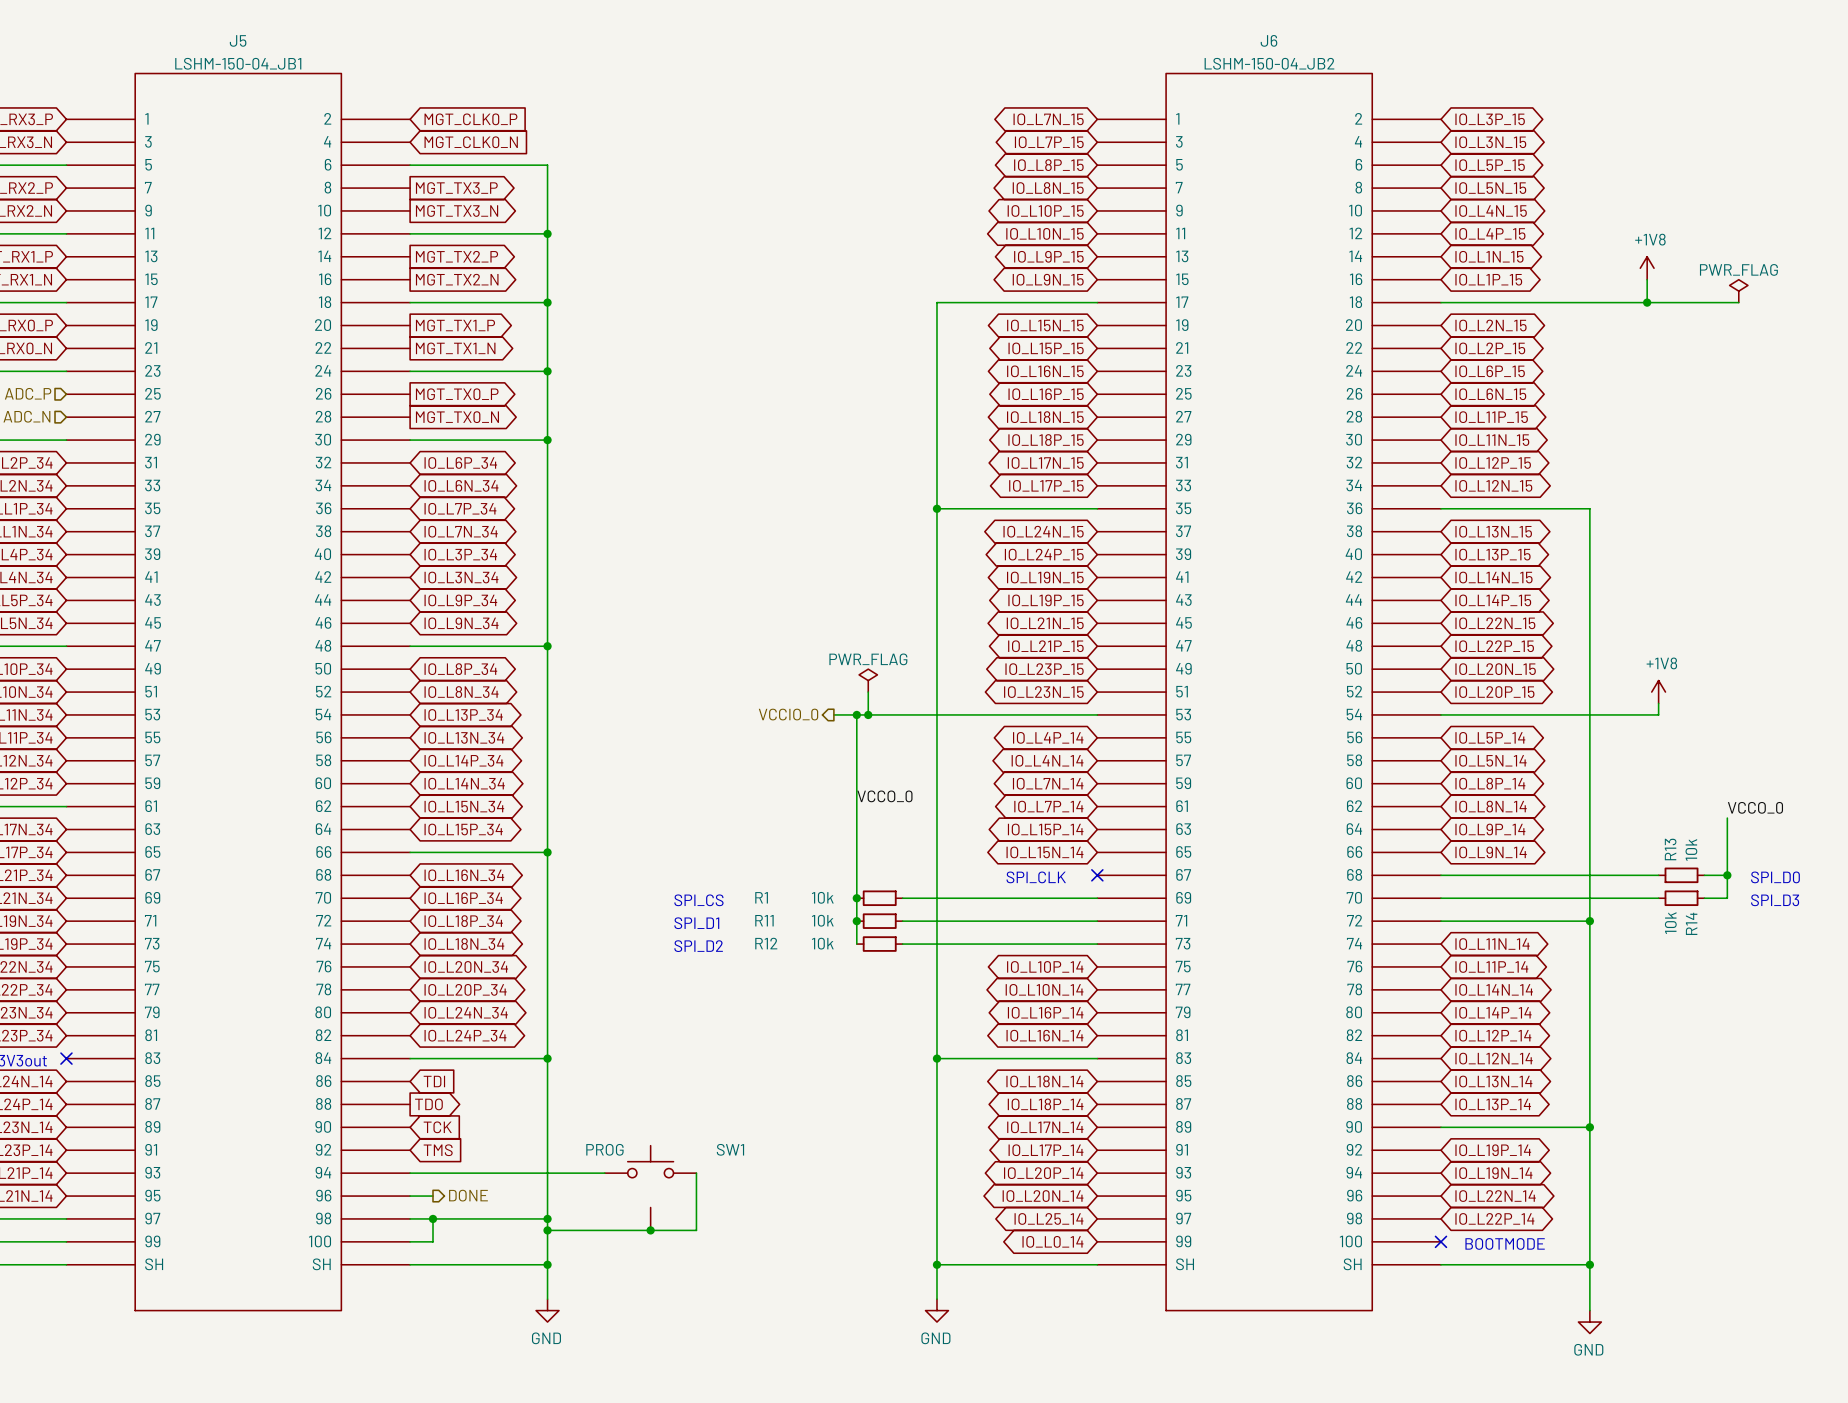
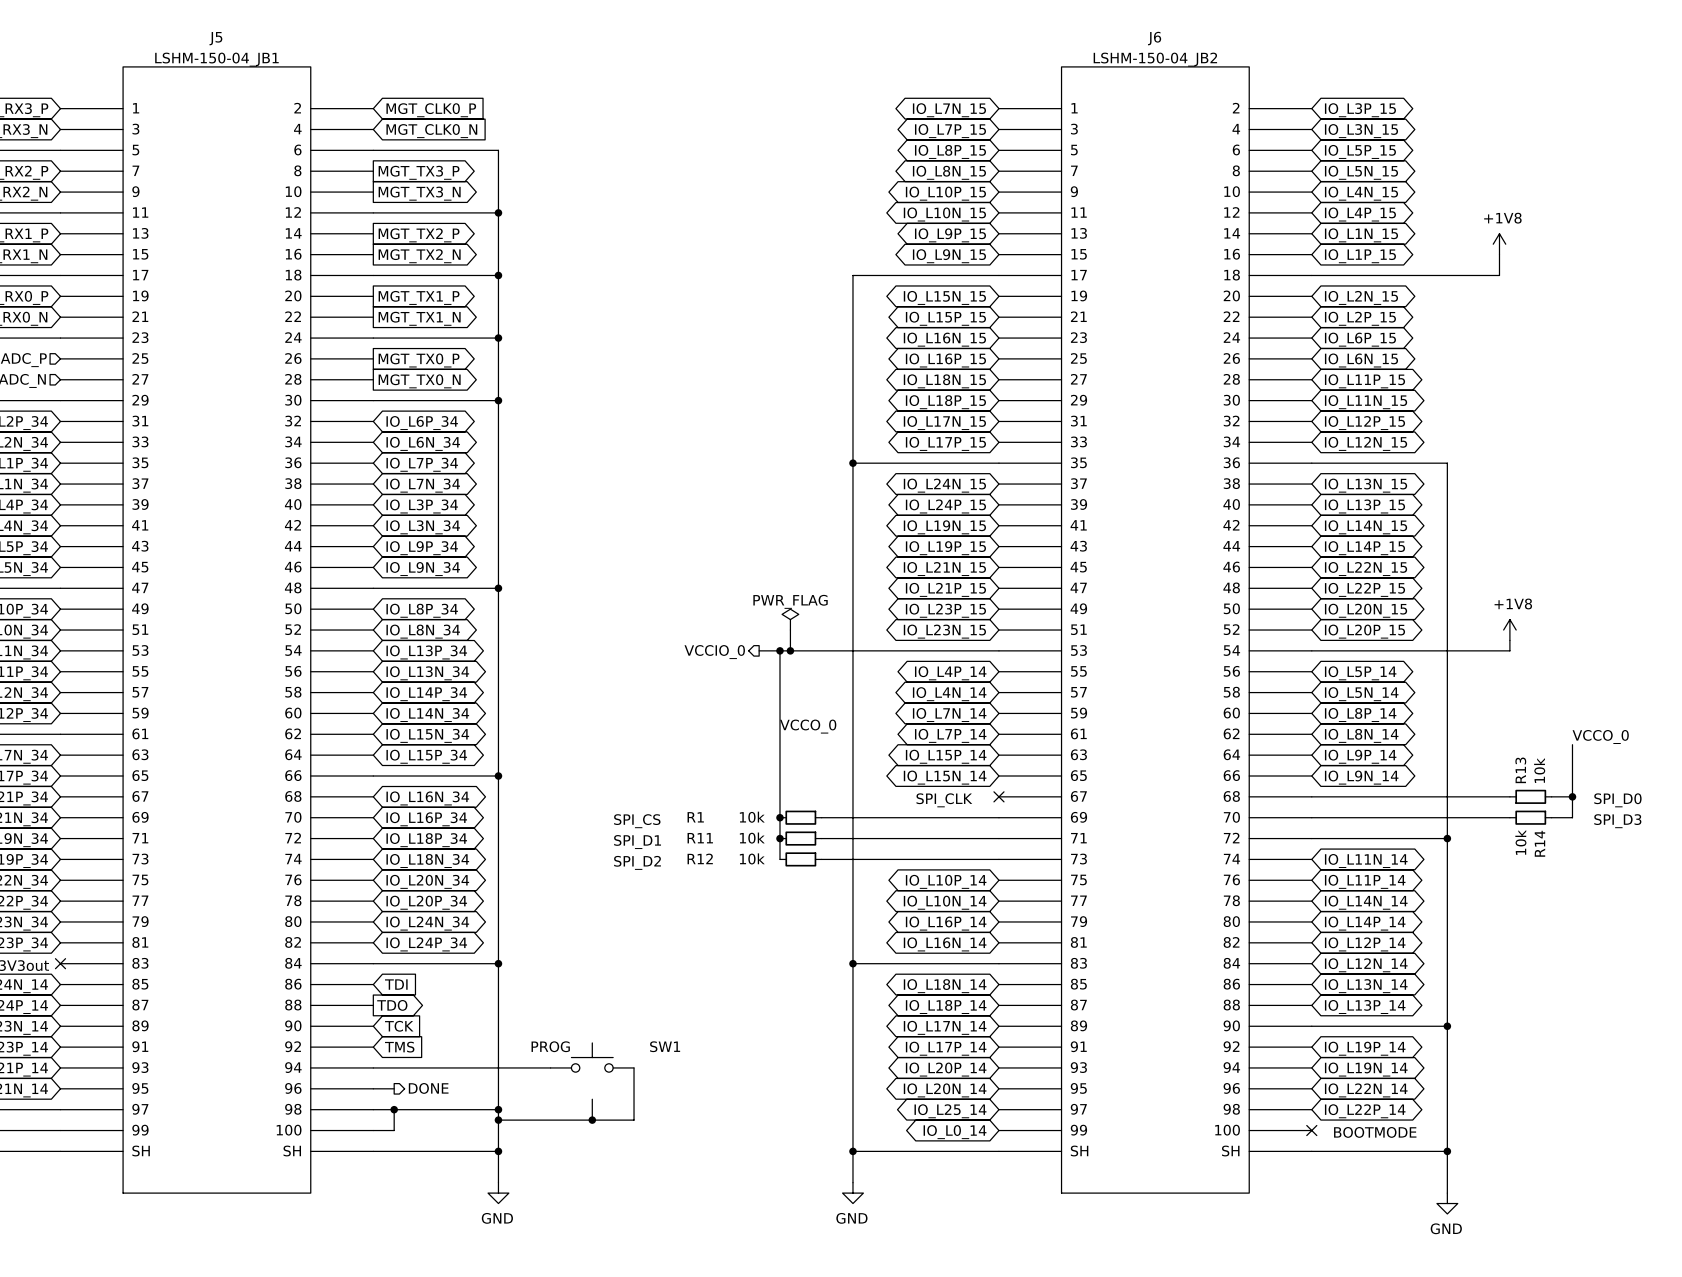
power symbol: PWR_FLAG (1738, 291) -> none
wire: (1647, 302) (1738, 302) -> none
junction: (1647, 302) -> none

